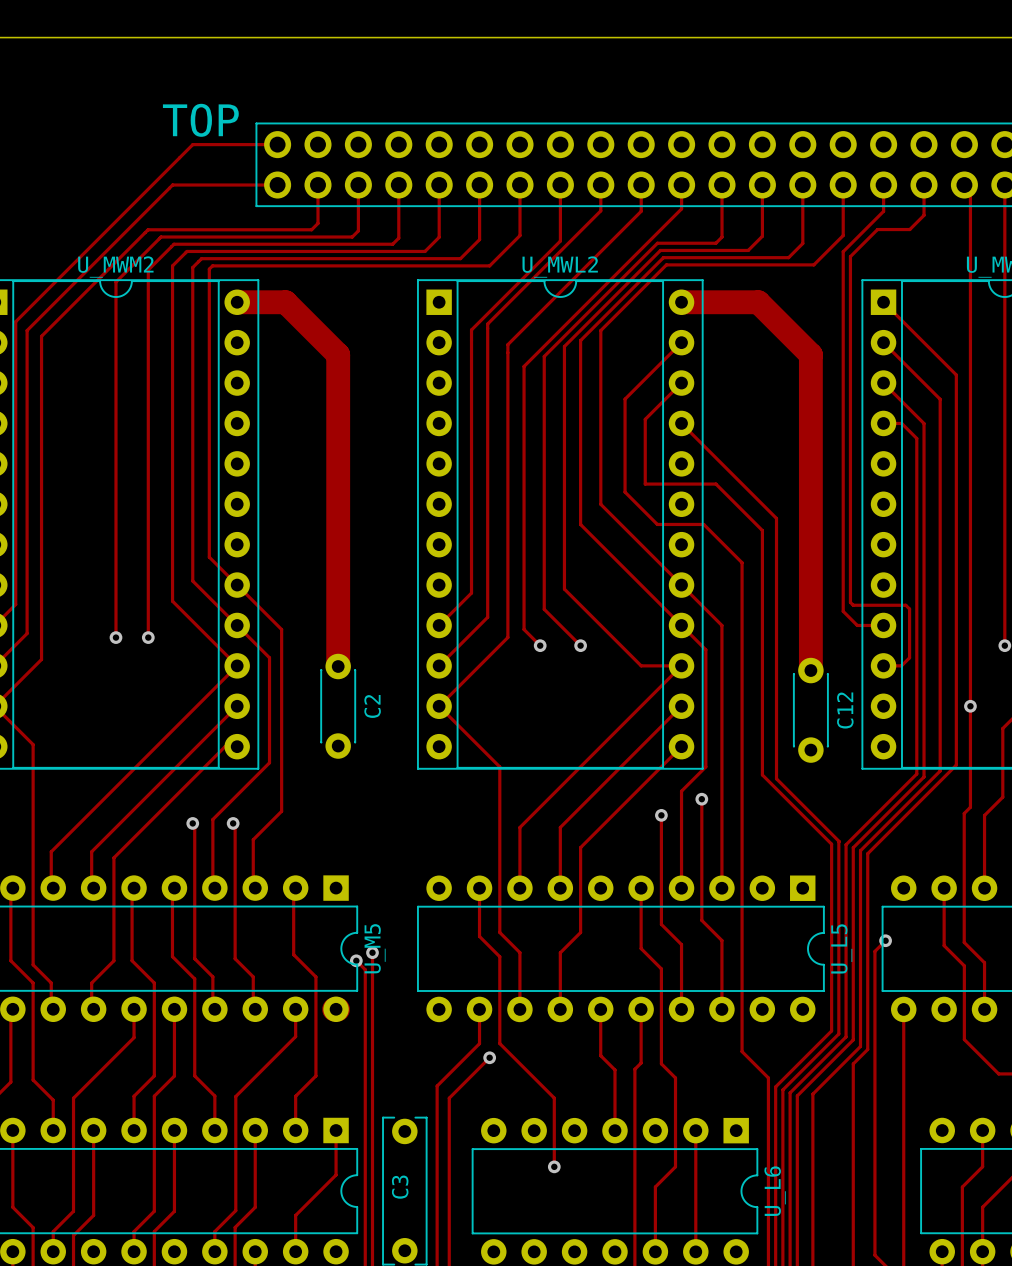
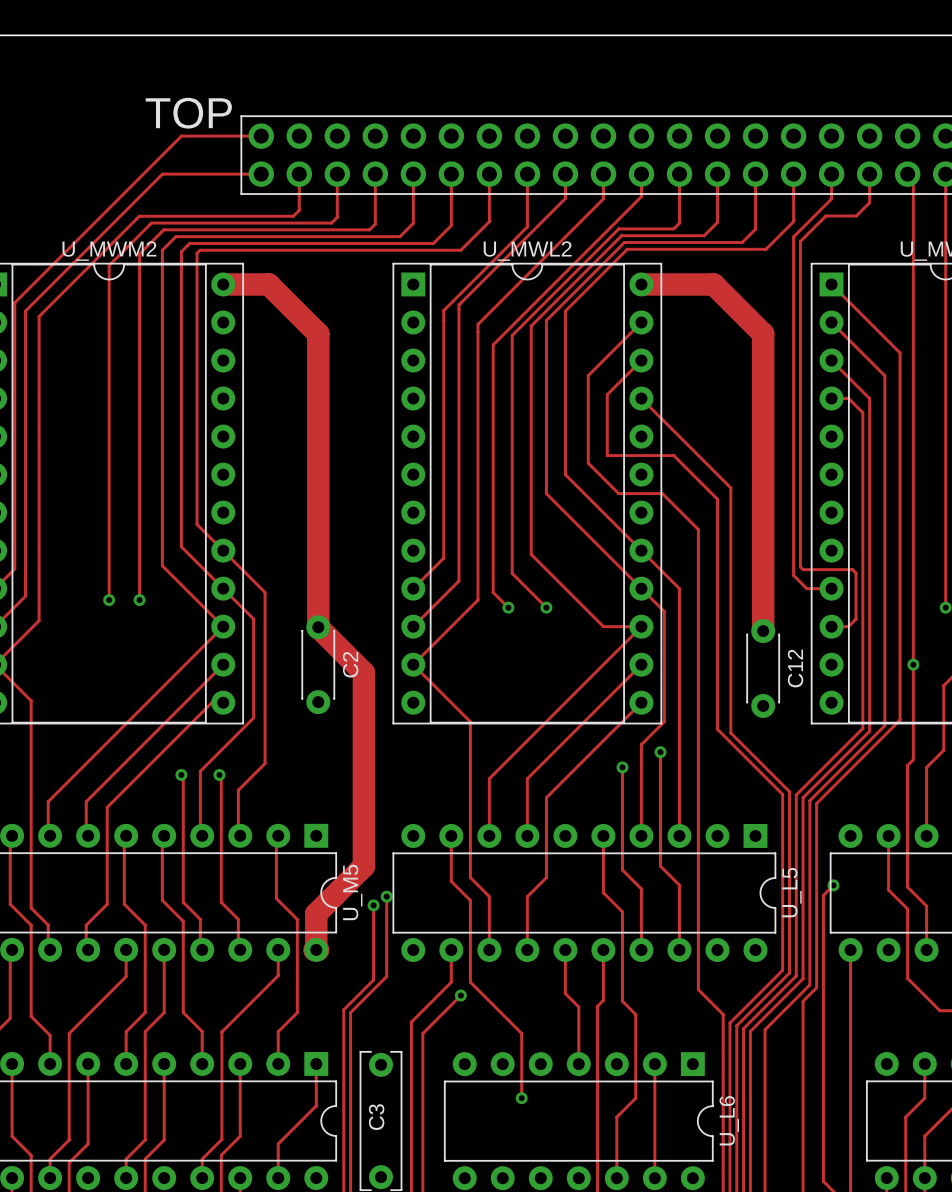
track: none -> (318, 627) (363, 672) (363, 866) (316, 913) (316, 949)
track: (372, 952) (372, 1075) -> (386, 896) (386, 976) (350, 1012)
via: (372, 952) -> none
via: none -> (386, 896)
track: (356, 960) (365, 969) (365, 1072) -> (373, 905) (373, 980) (343, 1009)
via: (356, 960) -> none
via: none -> (373, 905)

